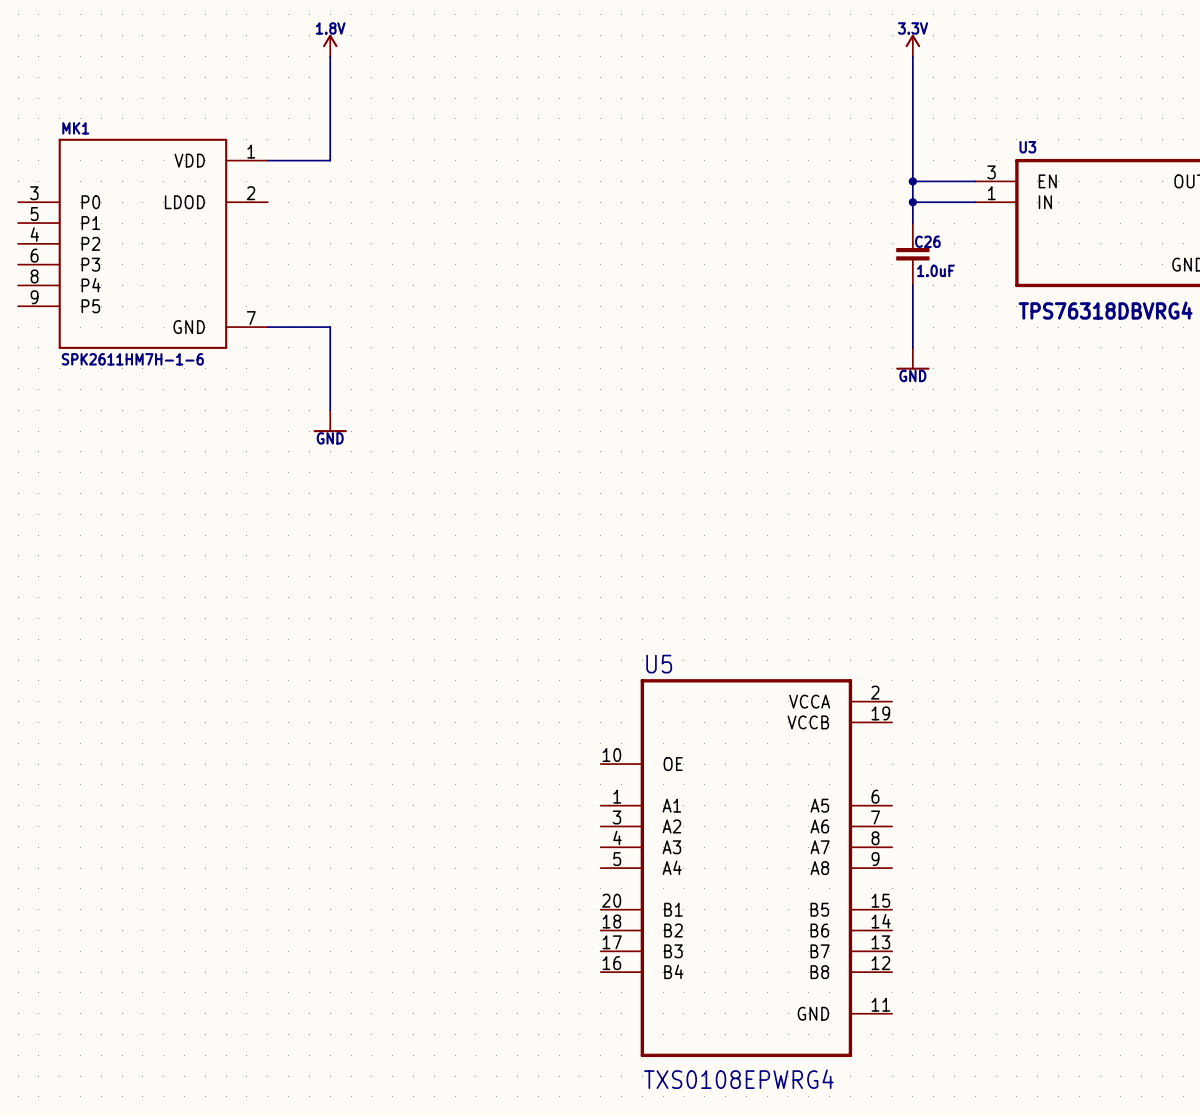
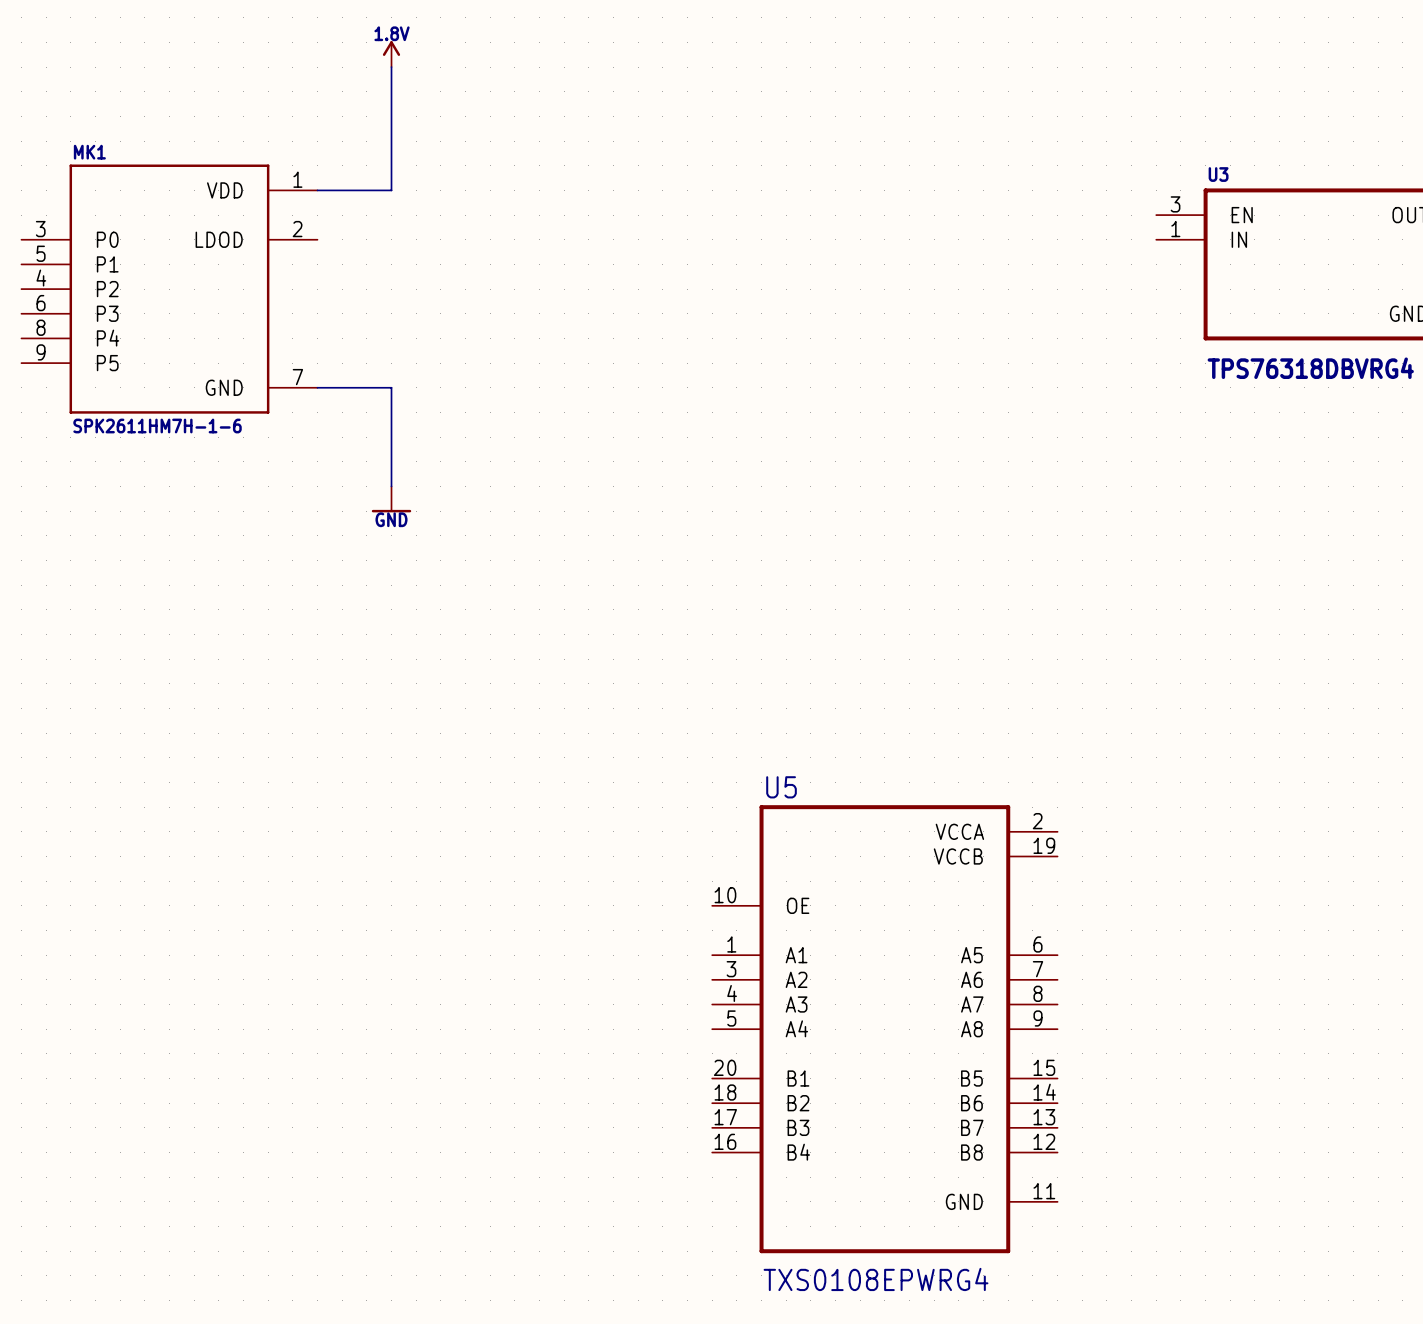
power symbol: 3.3V (912, 45) -> none
wire: (912, 56) (912, 223) -> none
wire: (912, 181) (975, 181) -> none
junction: (912, 181) -> none
wire: (912, 202) (975, 202) -> none
junction: (912, 202) -> none
C26: 1.0uF (912, 254) -> none
wire: (912, 285) (912, 347) -> none
power symbol: GND (912, 358) -> none

